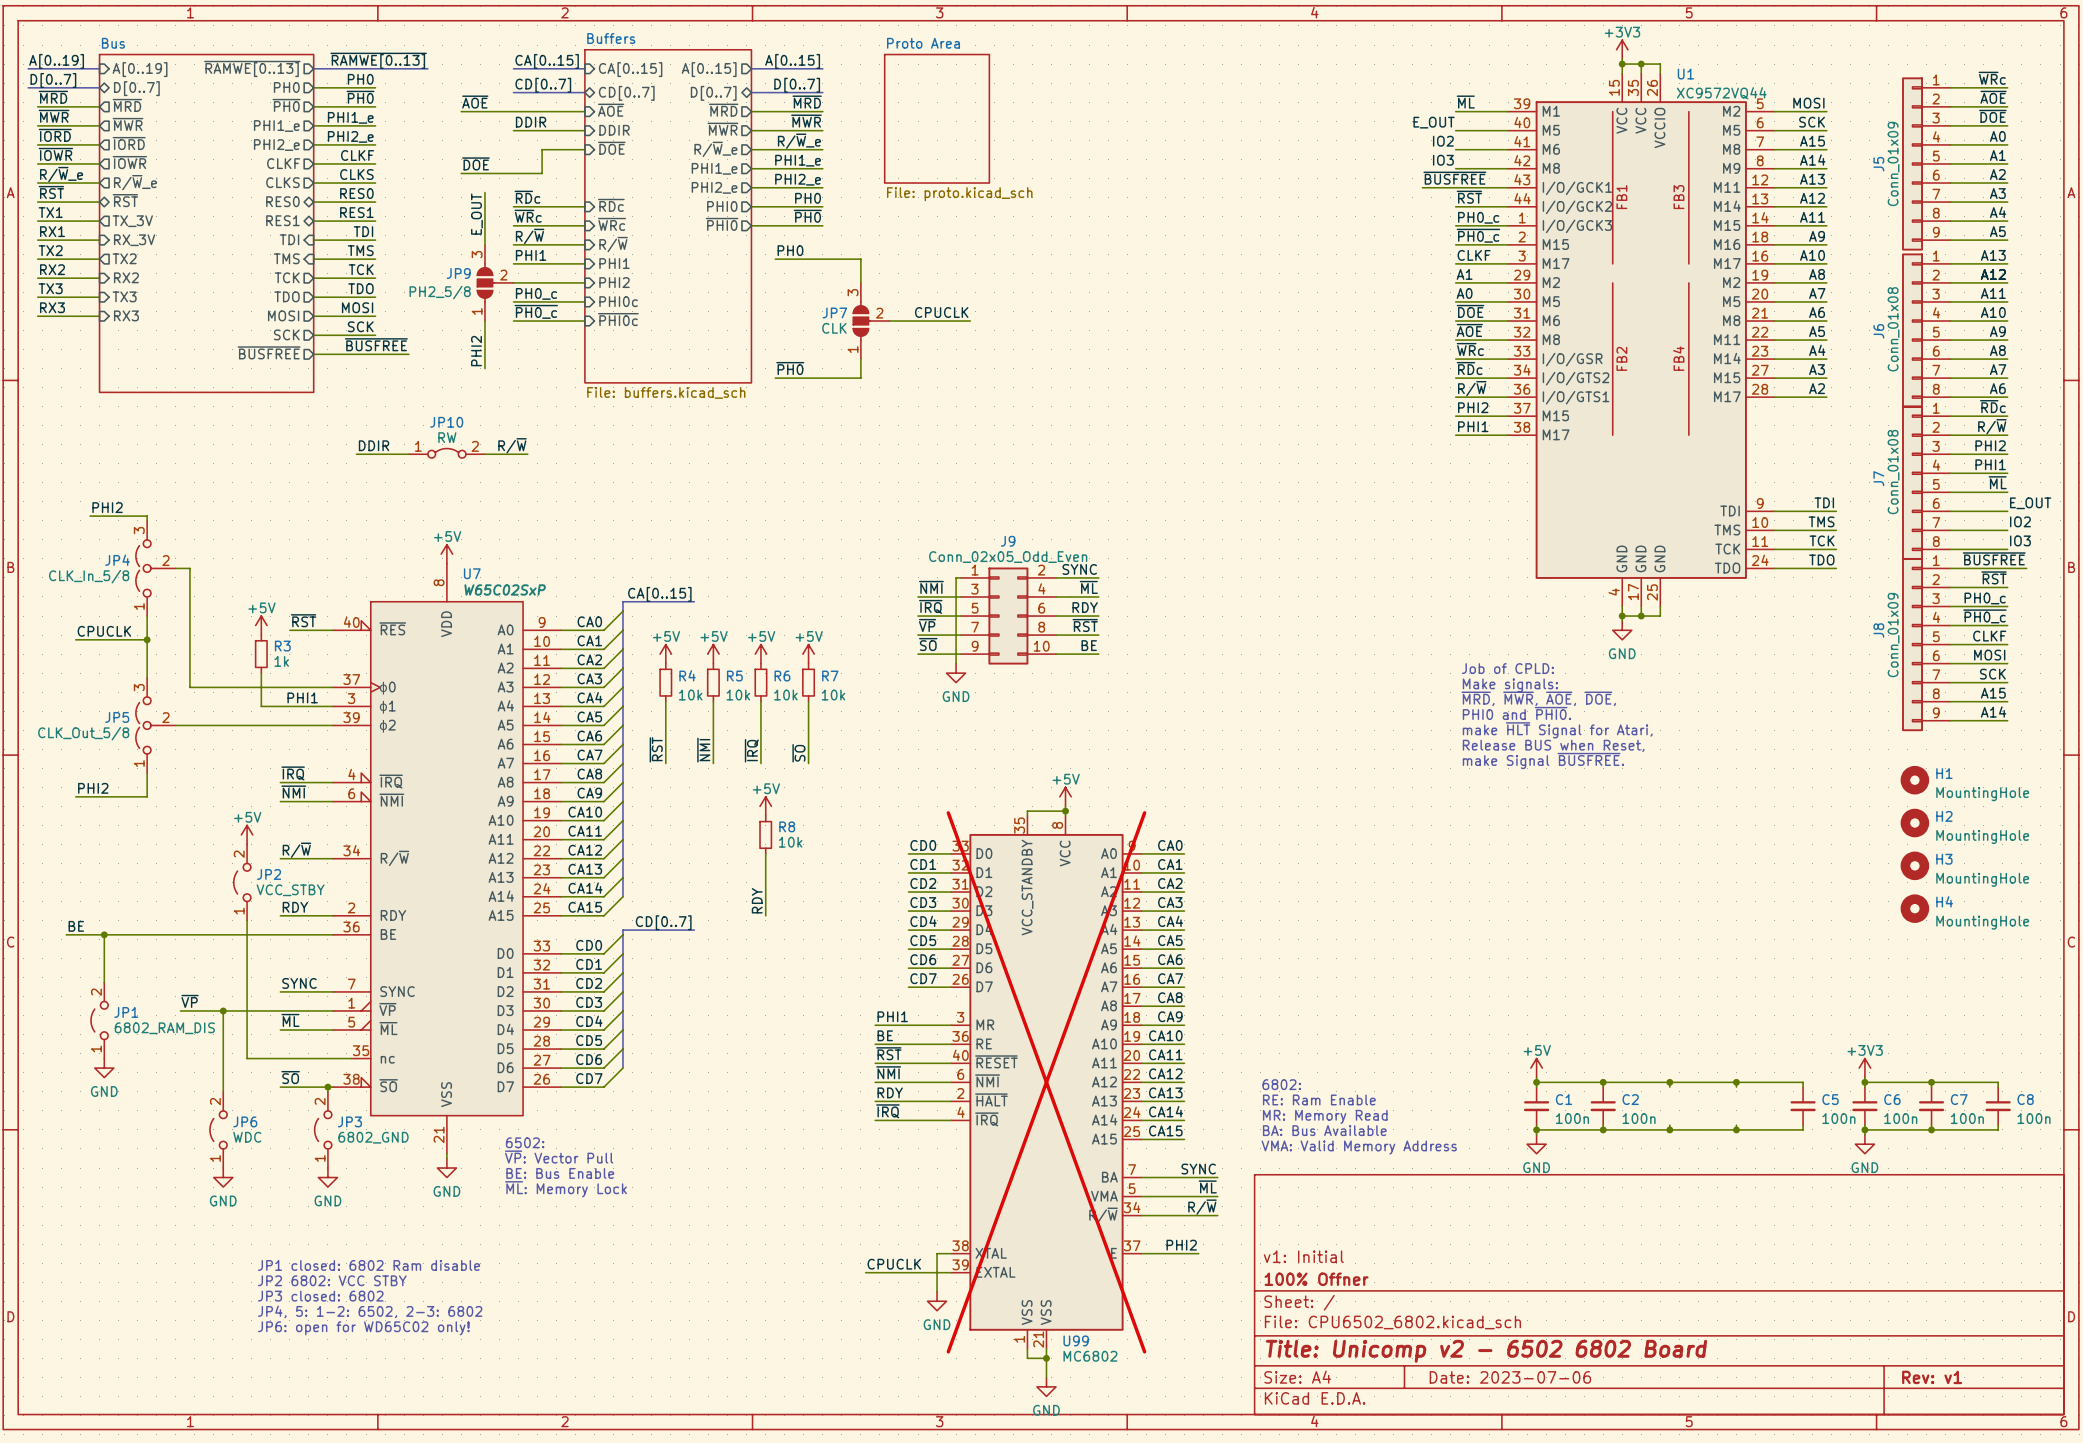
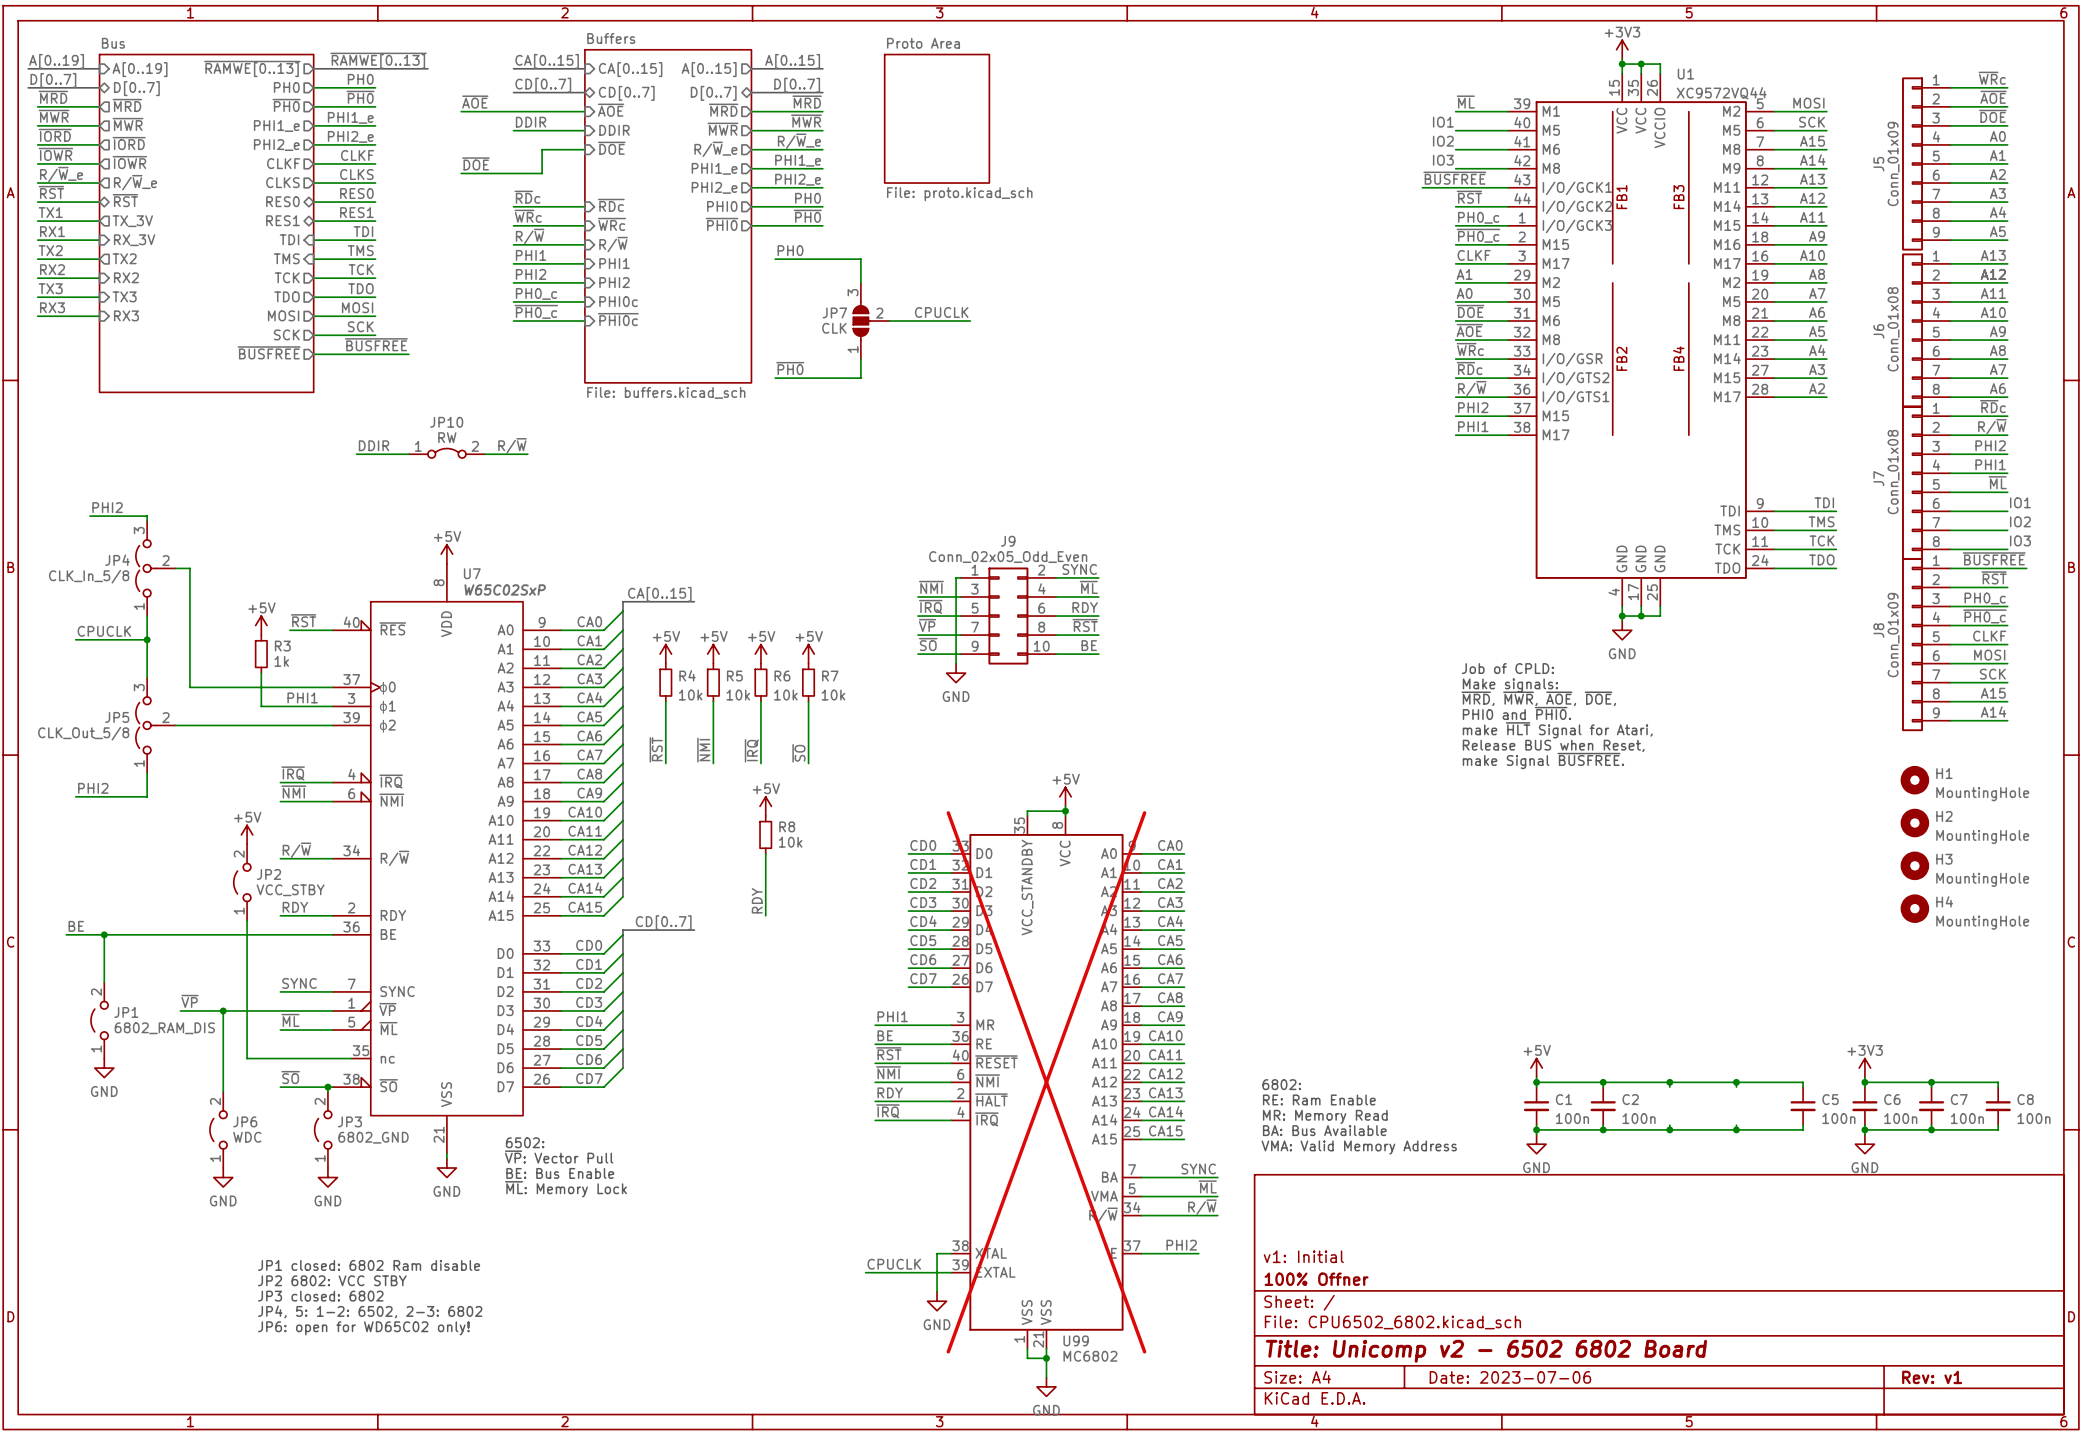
label: E_OUT (1434, 122) -> IO1 (1443, 122)
wire: (484, 192) (484, 244) -> none
label: E_OUT (476, 214) -> none
JP9: PH2_5/8 (495, 282) -> none
wire: (484, 321) (484, 368) -> none
label rotation: 0° (476, 351) -> 90° clockwise (531, 274)
label position: PHI2 (476, 351) -> PHI2 (531, 274)
label: E_OUT (2030, 503) -> IO1 (2020, 502)

